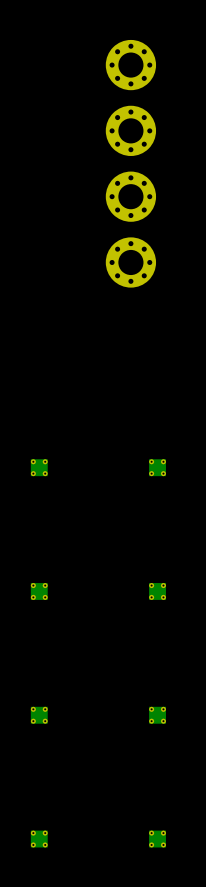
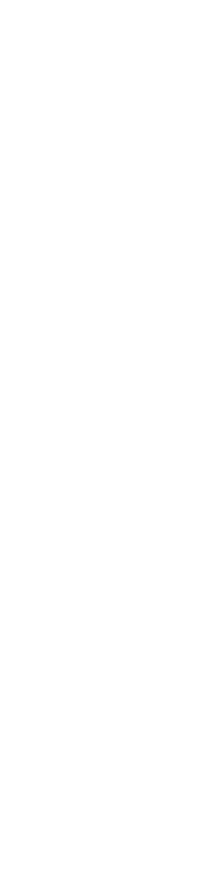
part: (130, 65) -> none
part: (130, 130) -> none
part: (130, 196) -> none
part: (130, 262) -> none
part: (39, 467) -> none
part: (157, 467) -> none
part: (39, 591) -> none
part: (157, 591) -> none
part: (39, 715) -> none
part: (157, 715) -> none
part: (39, 839) -> none
part: (157, 839) -> none

